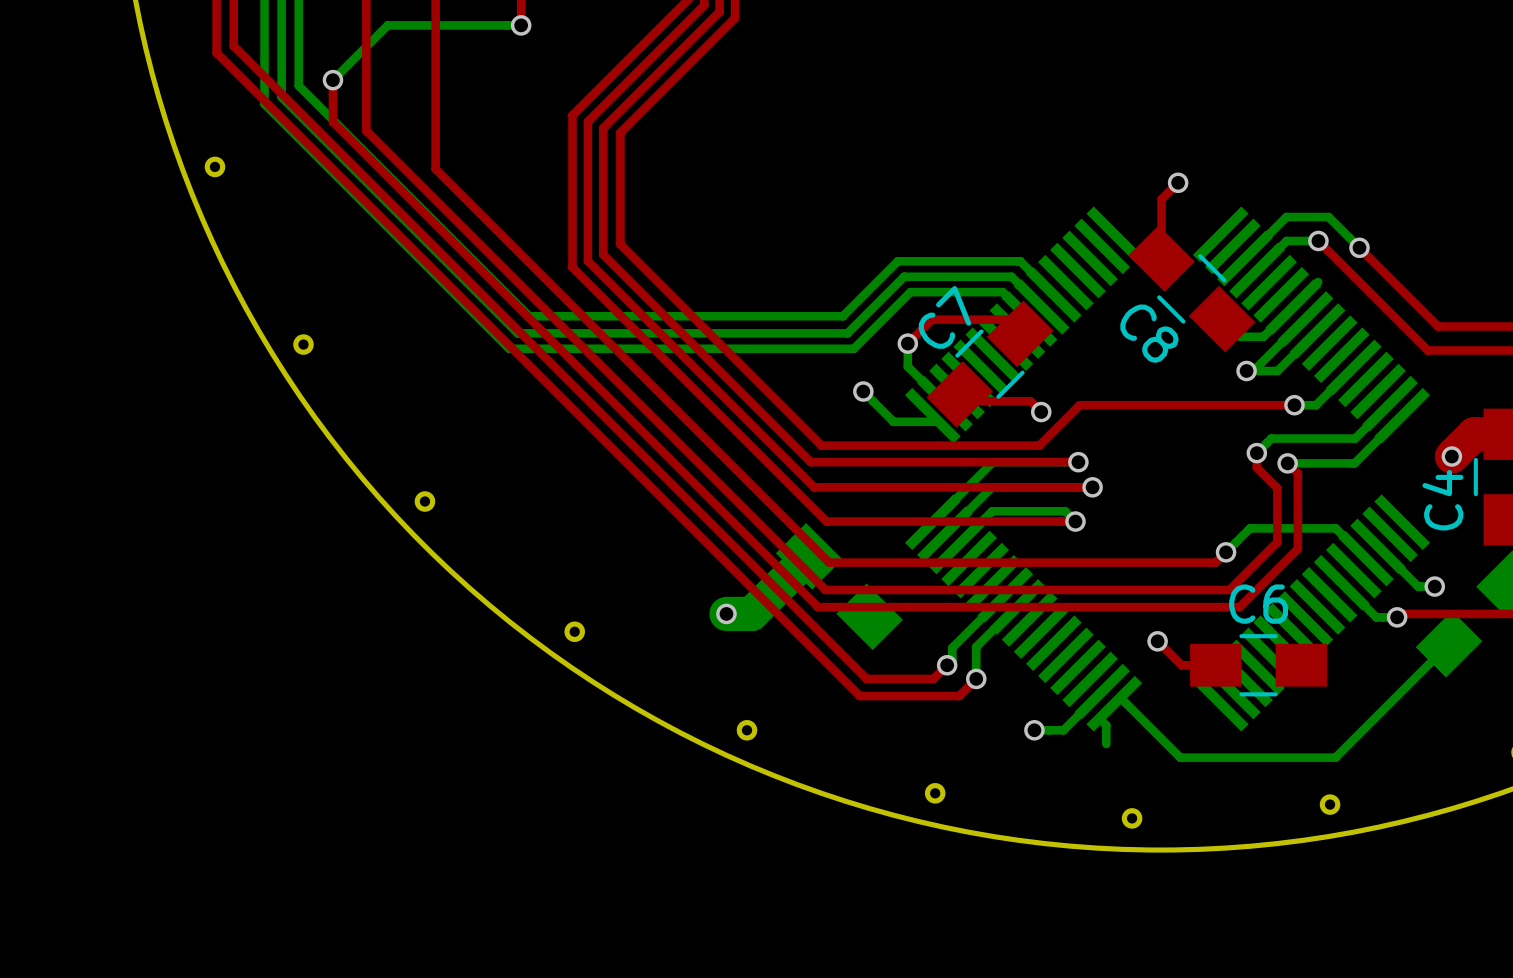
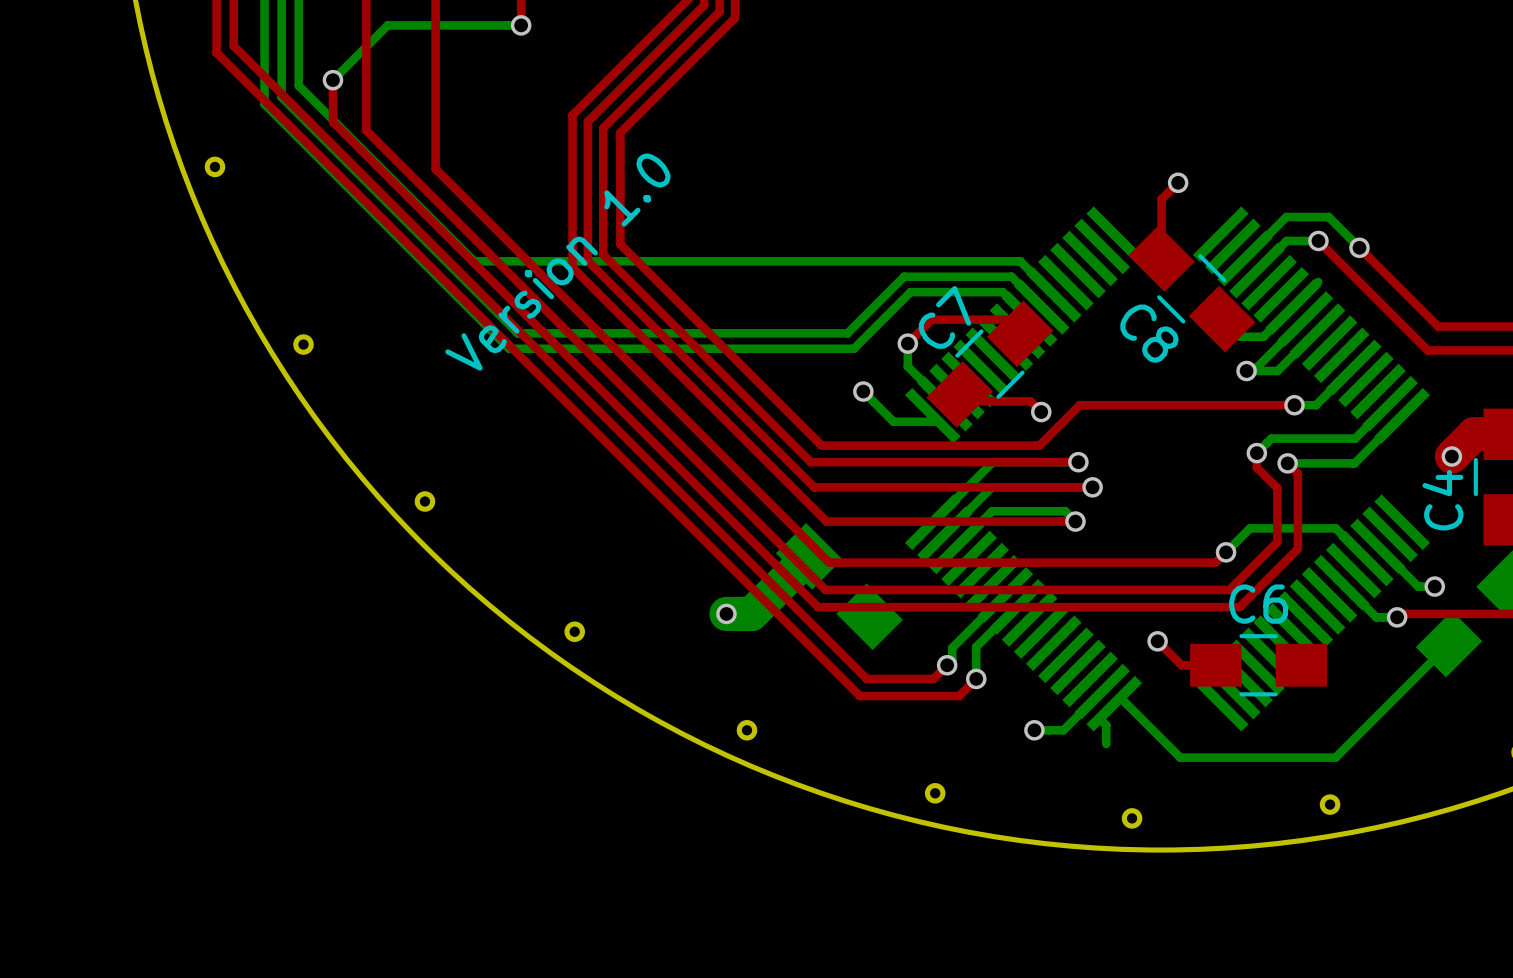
bottom track: (474, 261) (529, 316) (842, 316) (897, 261) -> (474, 261) (897, 261)
text: none -> Version 1.0 (557, 262)

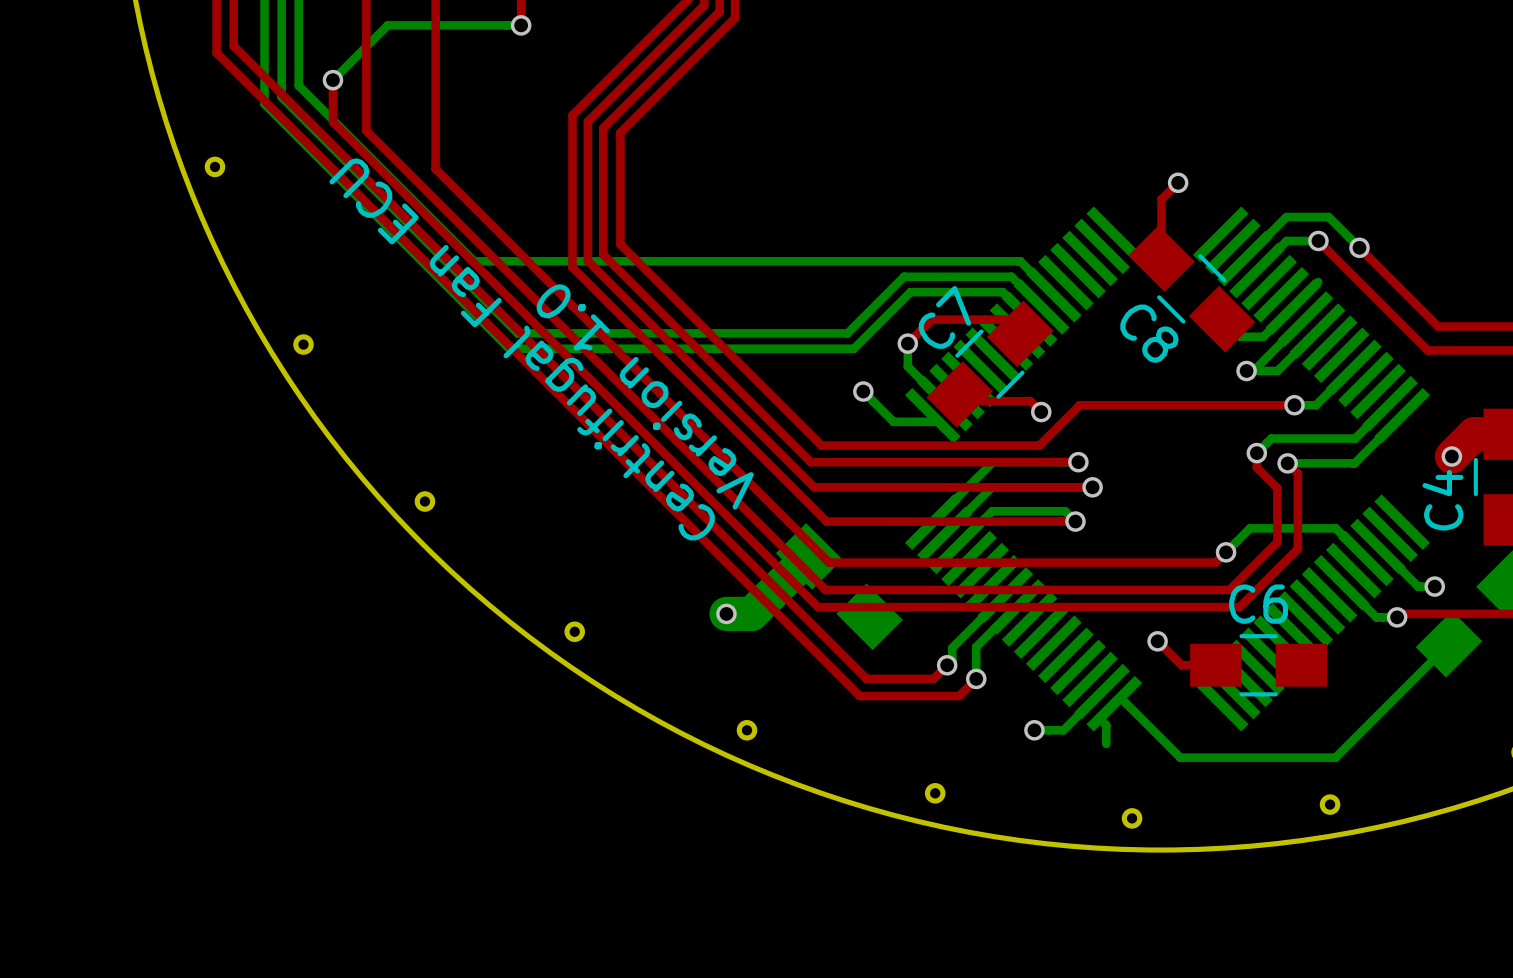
text rotation: 0° (557, 262) -> 90° counterclockwise (645, 396)
text: none -> Centrifugal Fan ECU (522, 349)

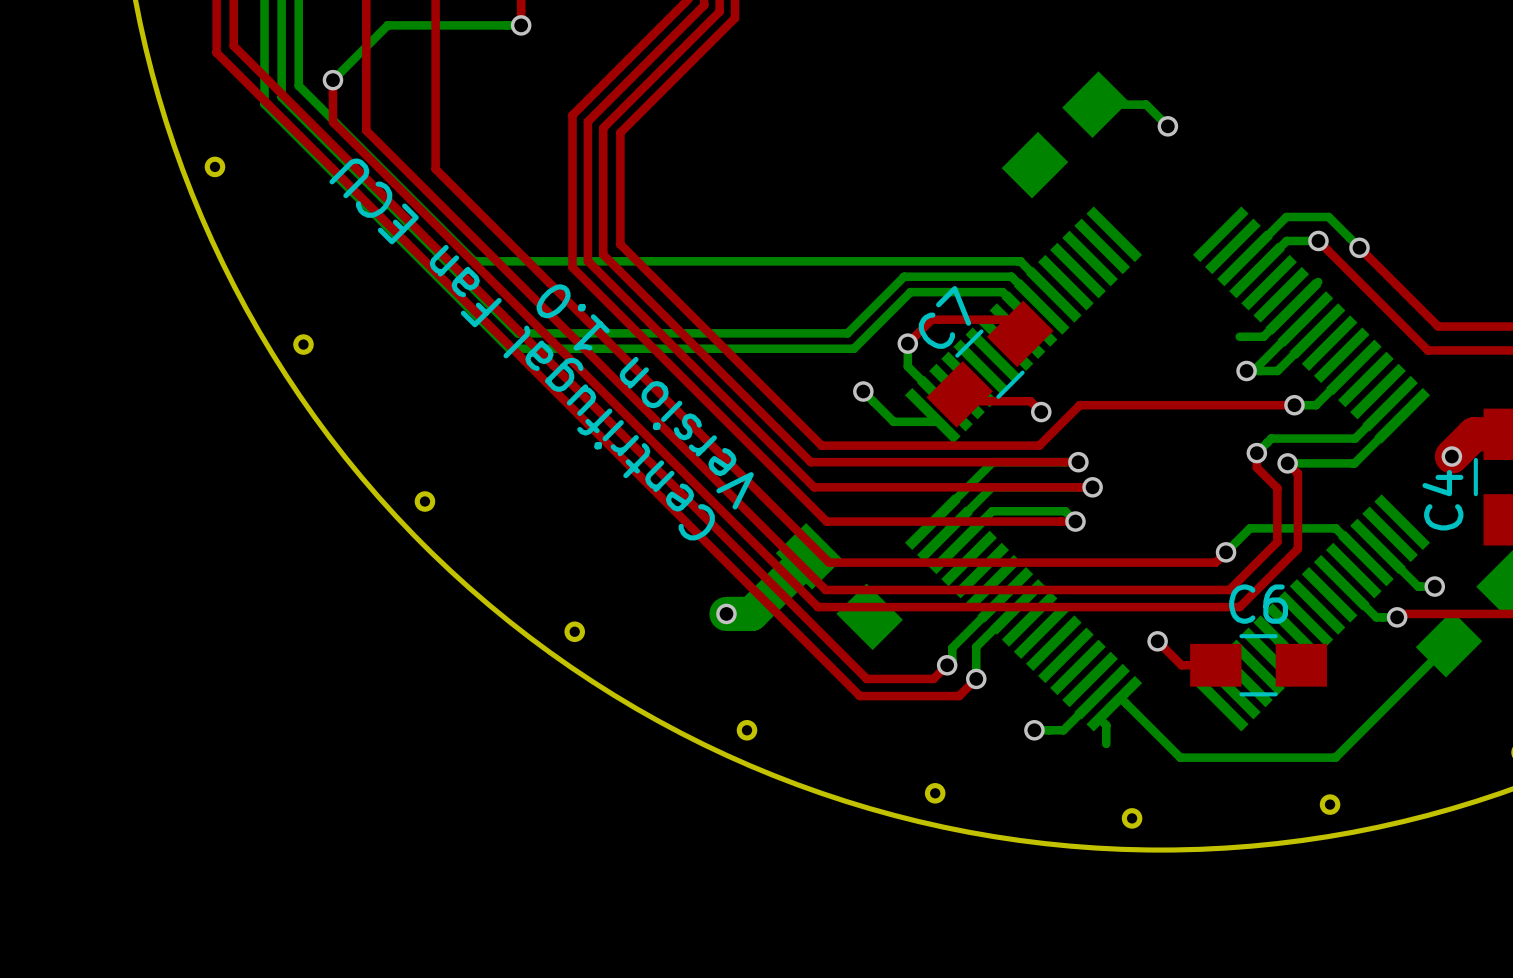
bottom track: none -> (1095, 104) (1146, 104) (1167, 126)
top track: (1178, 182) (1161, 199) (1161, 258) -> none
via position: (1178, 182) -> (1167, 126)
C8 side: top (1191, 288) -> bottom (1065, 134)

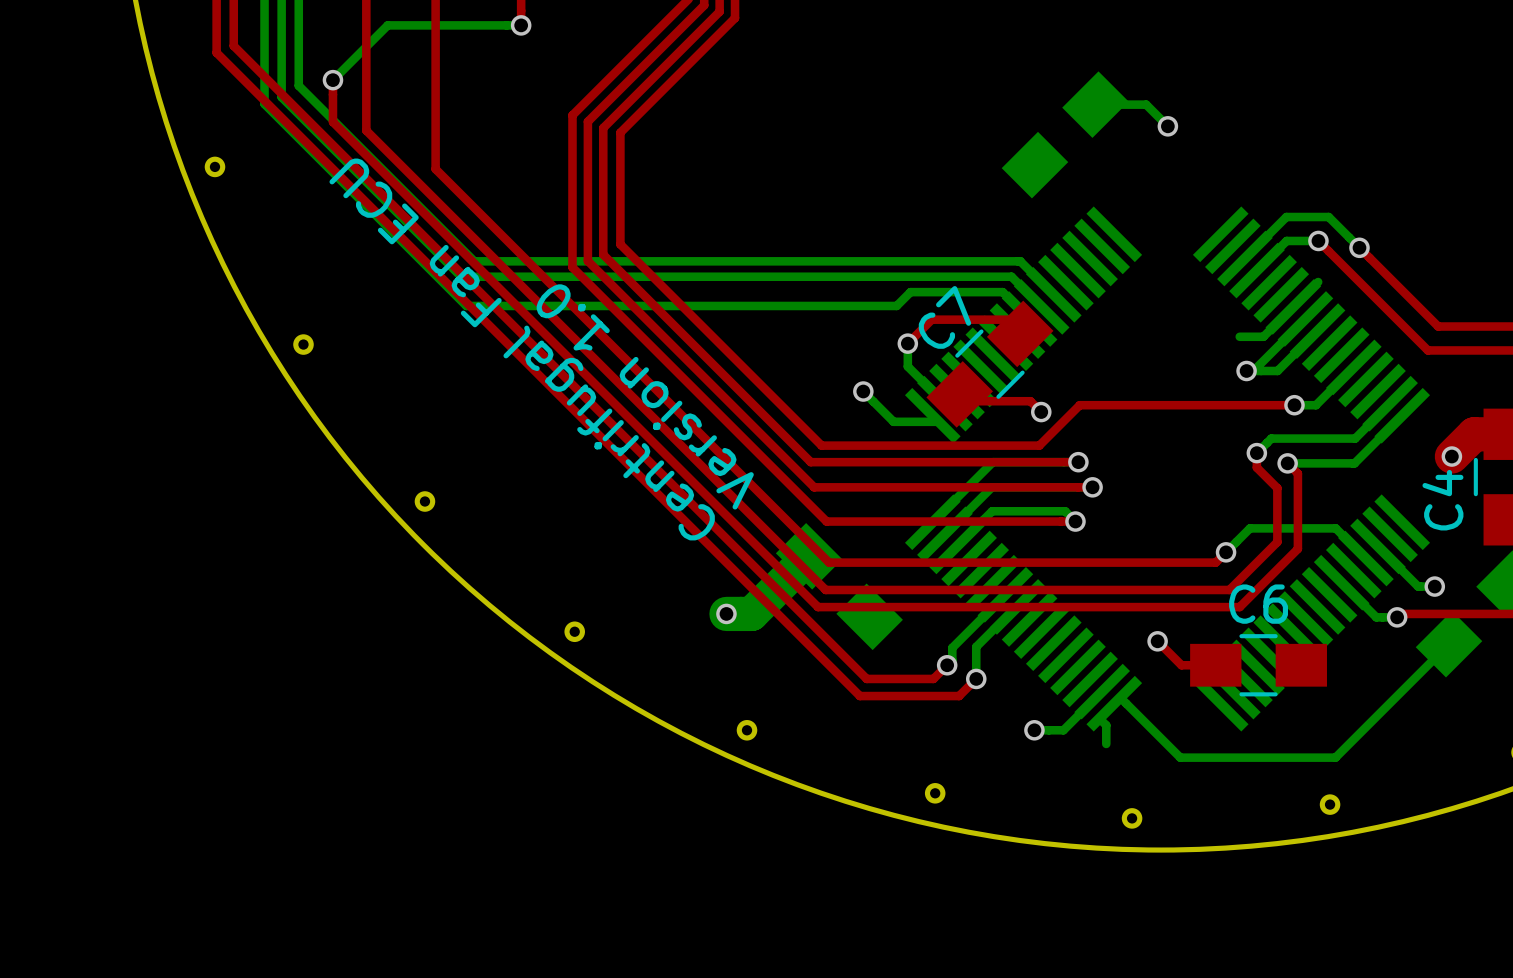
bottom track: (461, 276) (517, 333) (847, 333) (904, 276) -> (461, 276) (904, 276)
bottom track: (466, 305) (509, 348) (853, 348) (896, 305) -> (466, 305) (896, 305)

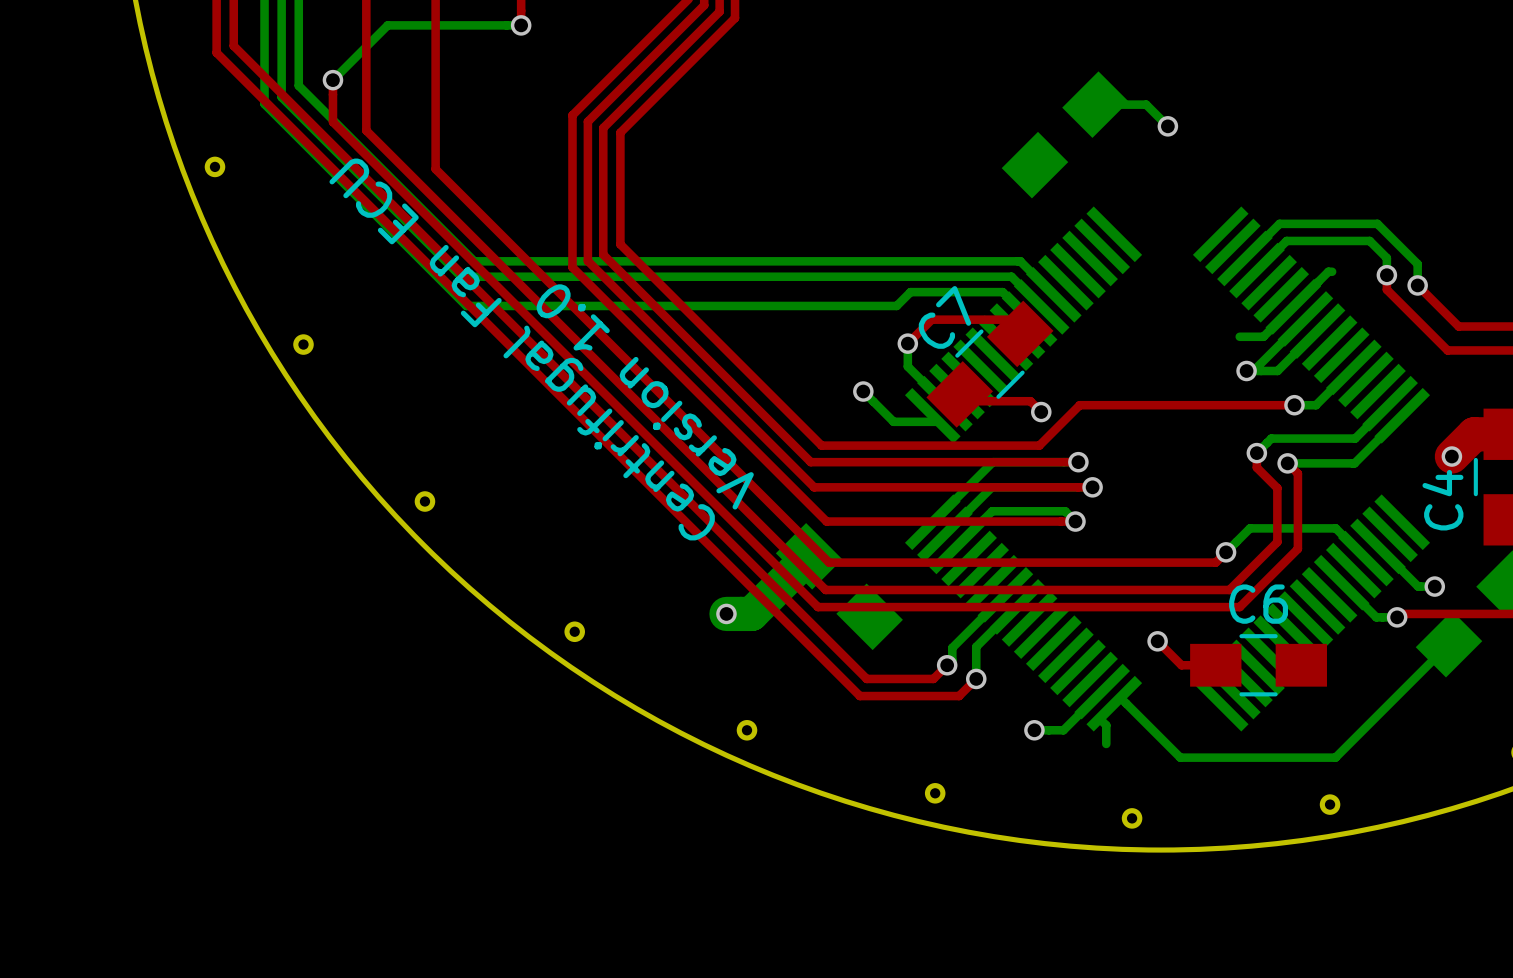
bottom track: (1279, 223) (1286, 217) (1328, 217) (1359, 247) -> (1279, 223) (1377, 223) (1417, 264) (1417, 285)
top track: (1318, 240) (1427, 350) (1447, 350) -> (1386, 275) (1386, 289) (1447, 350)
bottom track: none -> (1318, 240) (1369, 240) (1386, 258) (1386, 275)
via: (1318, 240) -> none
top track: (1359, 247) (1438, 326) (1458, 326) -> (1417, 285) (1458, 326)
via: (1359, 247) -> none
bottom track: none -> (1332, 271) (1328, 271) (1318, 282)
via: none -> (1386, 275)
via: none -> (1417, 285)

